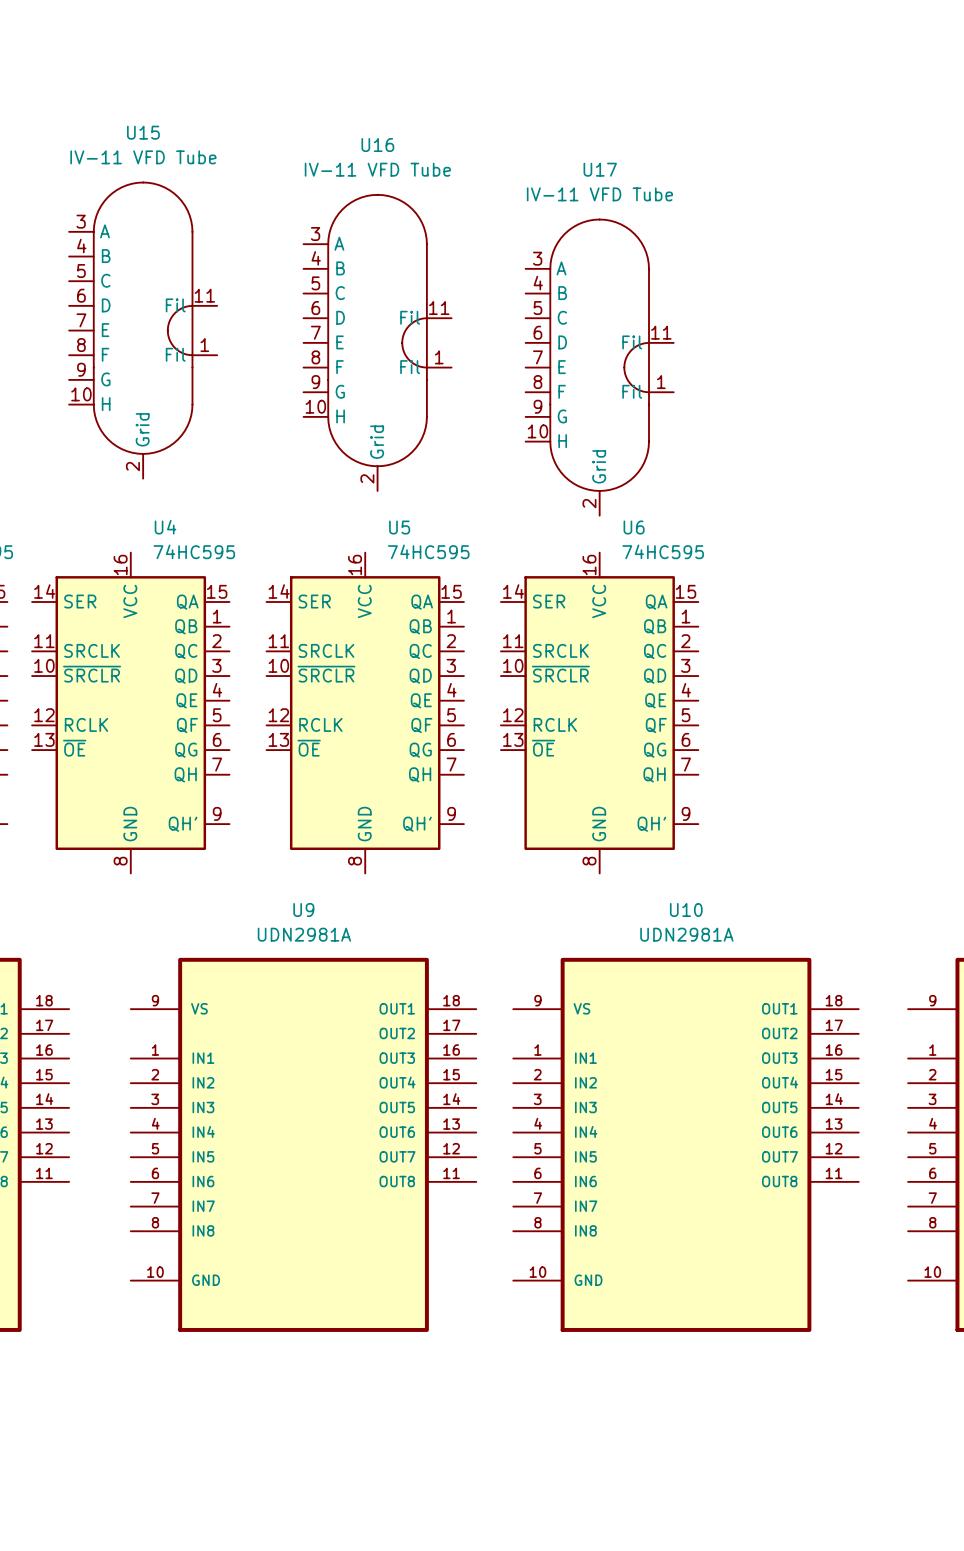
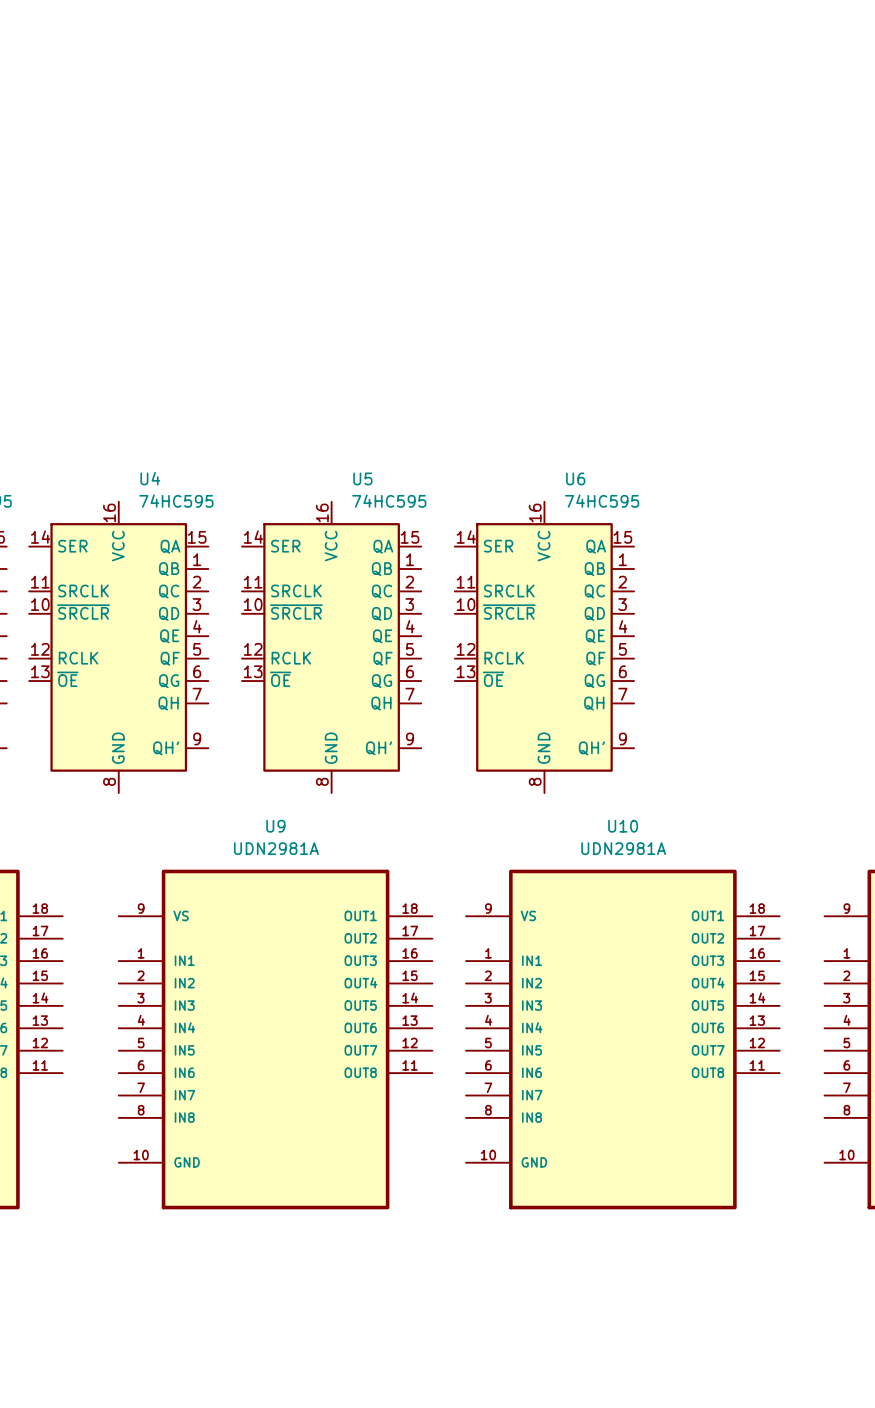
U15: IV-11 VFD Tube (143, 330) -> none
U16: IV-11 VFD Tube (377, 342) -> none
U17: IV-11 VFD Tube (599, 367) -> none

